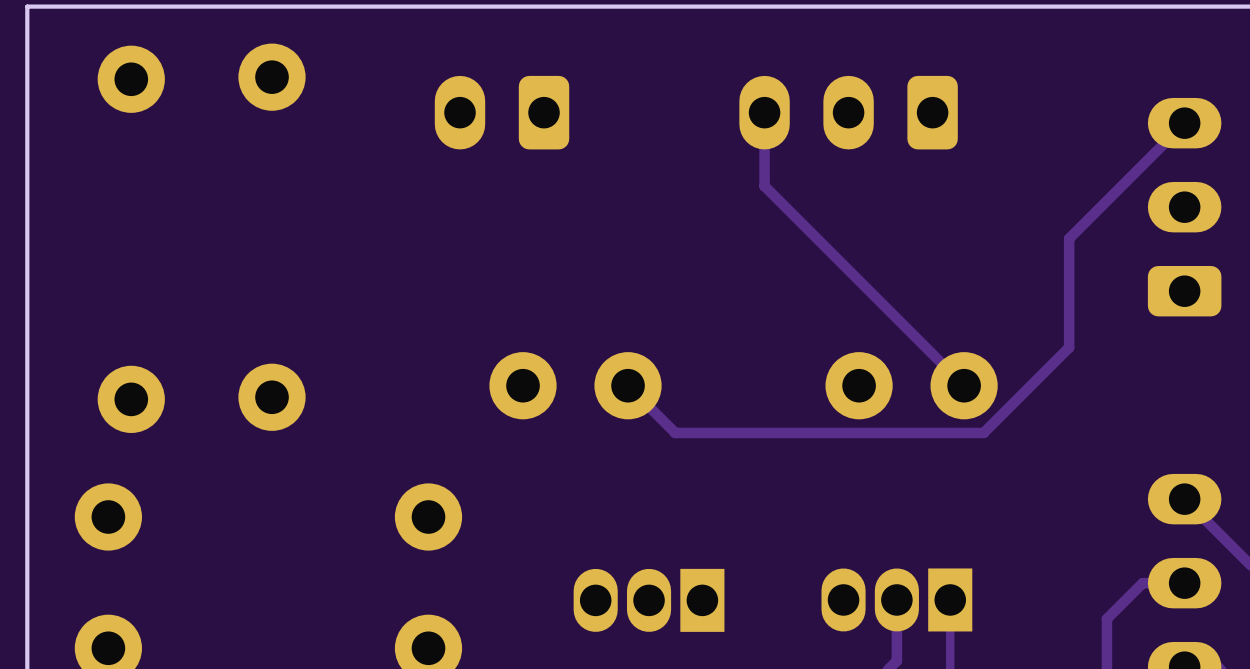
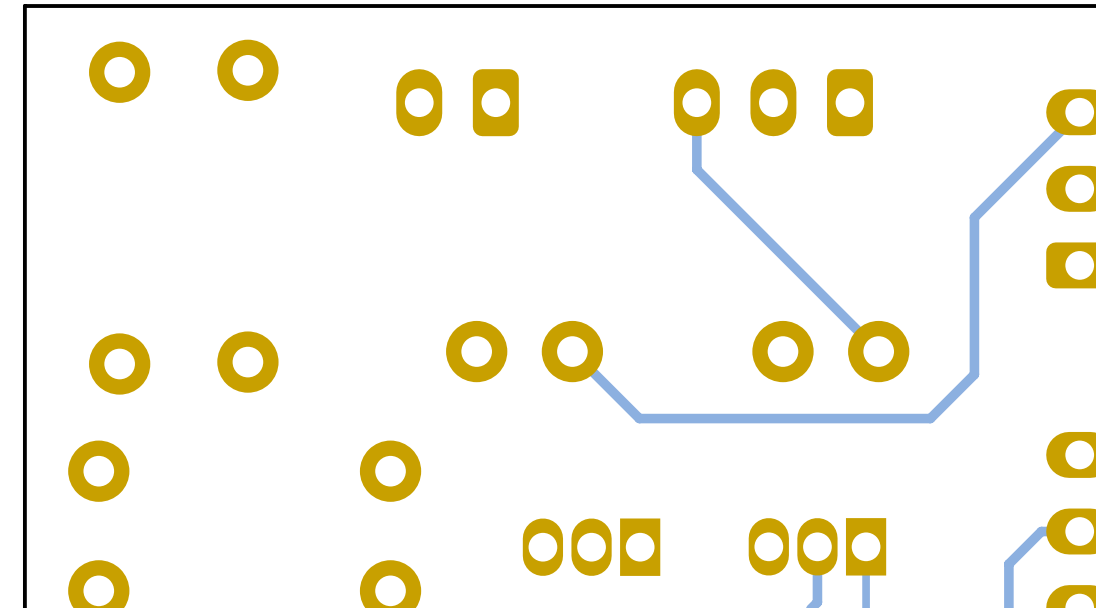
track: (1069, 347) (983, 432) (675, 432) -> (974, 316) (974, 374) (930, 418) (639, 418) (615, 394)

